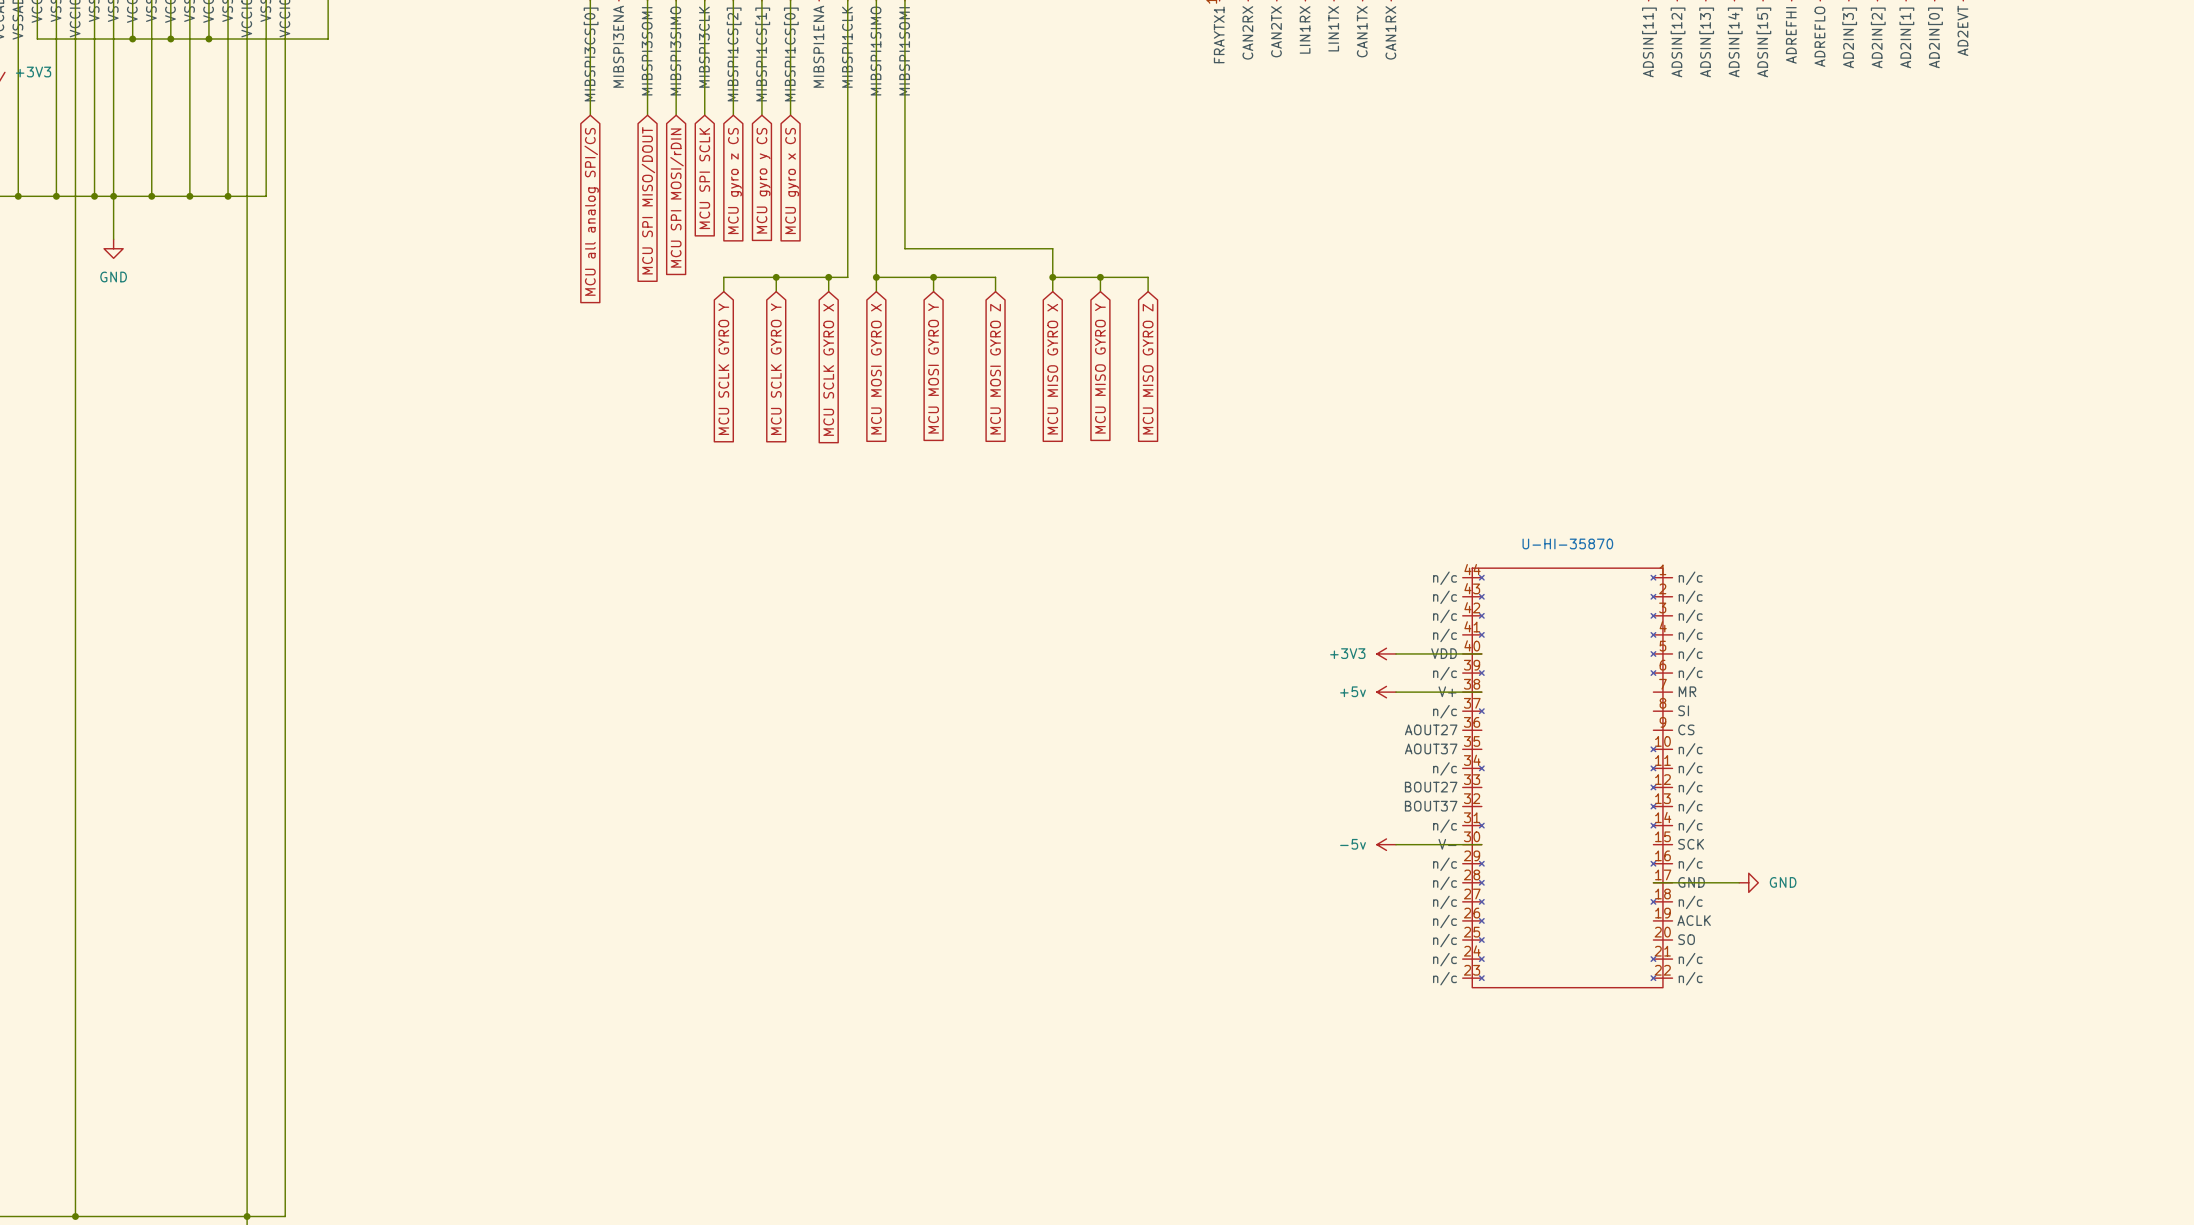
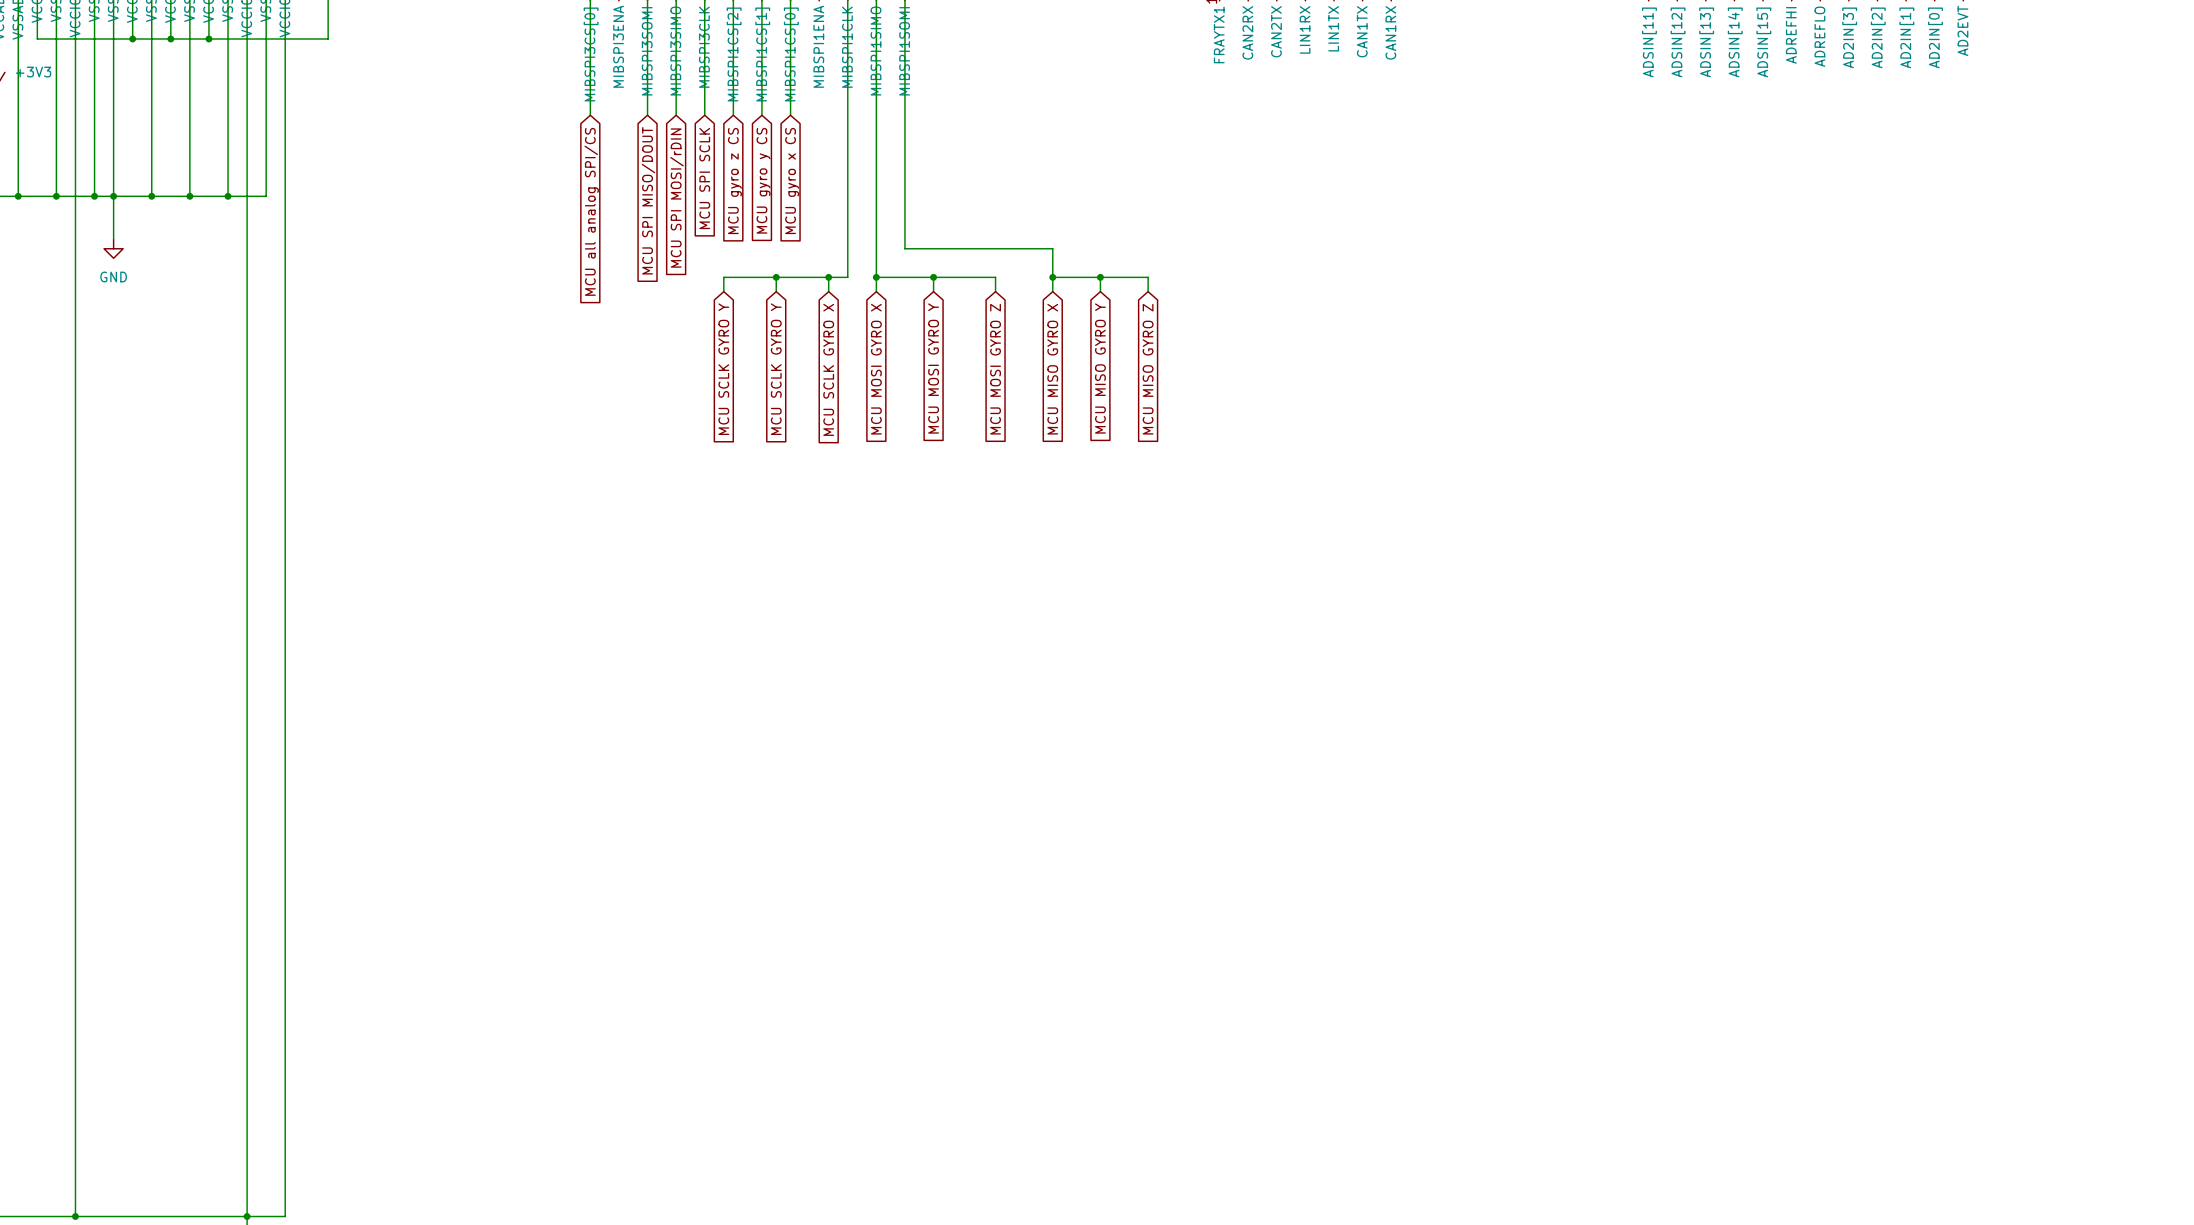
power symbol: +3V3 (1386, 653) -> none
wire: (1396, 653) (1481, 653) -> none
power symbol: +5v (1386, 692) -> none
wire: (1396, 692) (1481, 692) -> none
U-HI-35870: (1567, 777) -> none
power symbol: -5v (1386, 844) -> none
wire: (1396, 844) (1481, 844) -> none
wire: (1653, 882) (1739, 882) -> none
power symbol: GND (1748, 882) -> none

